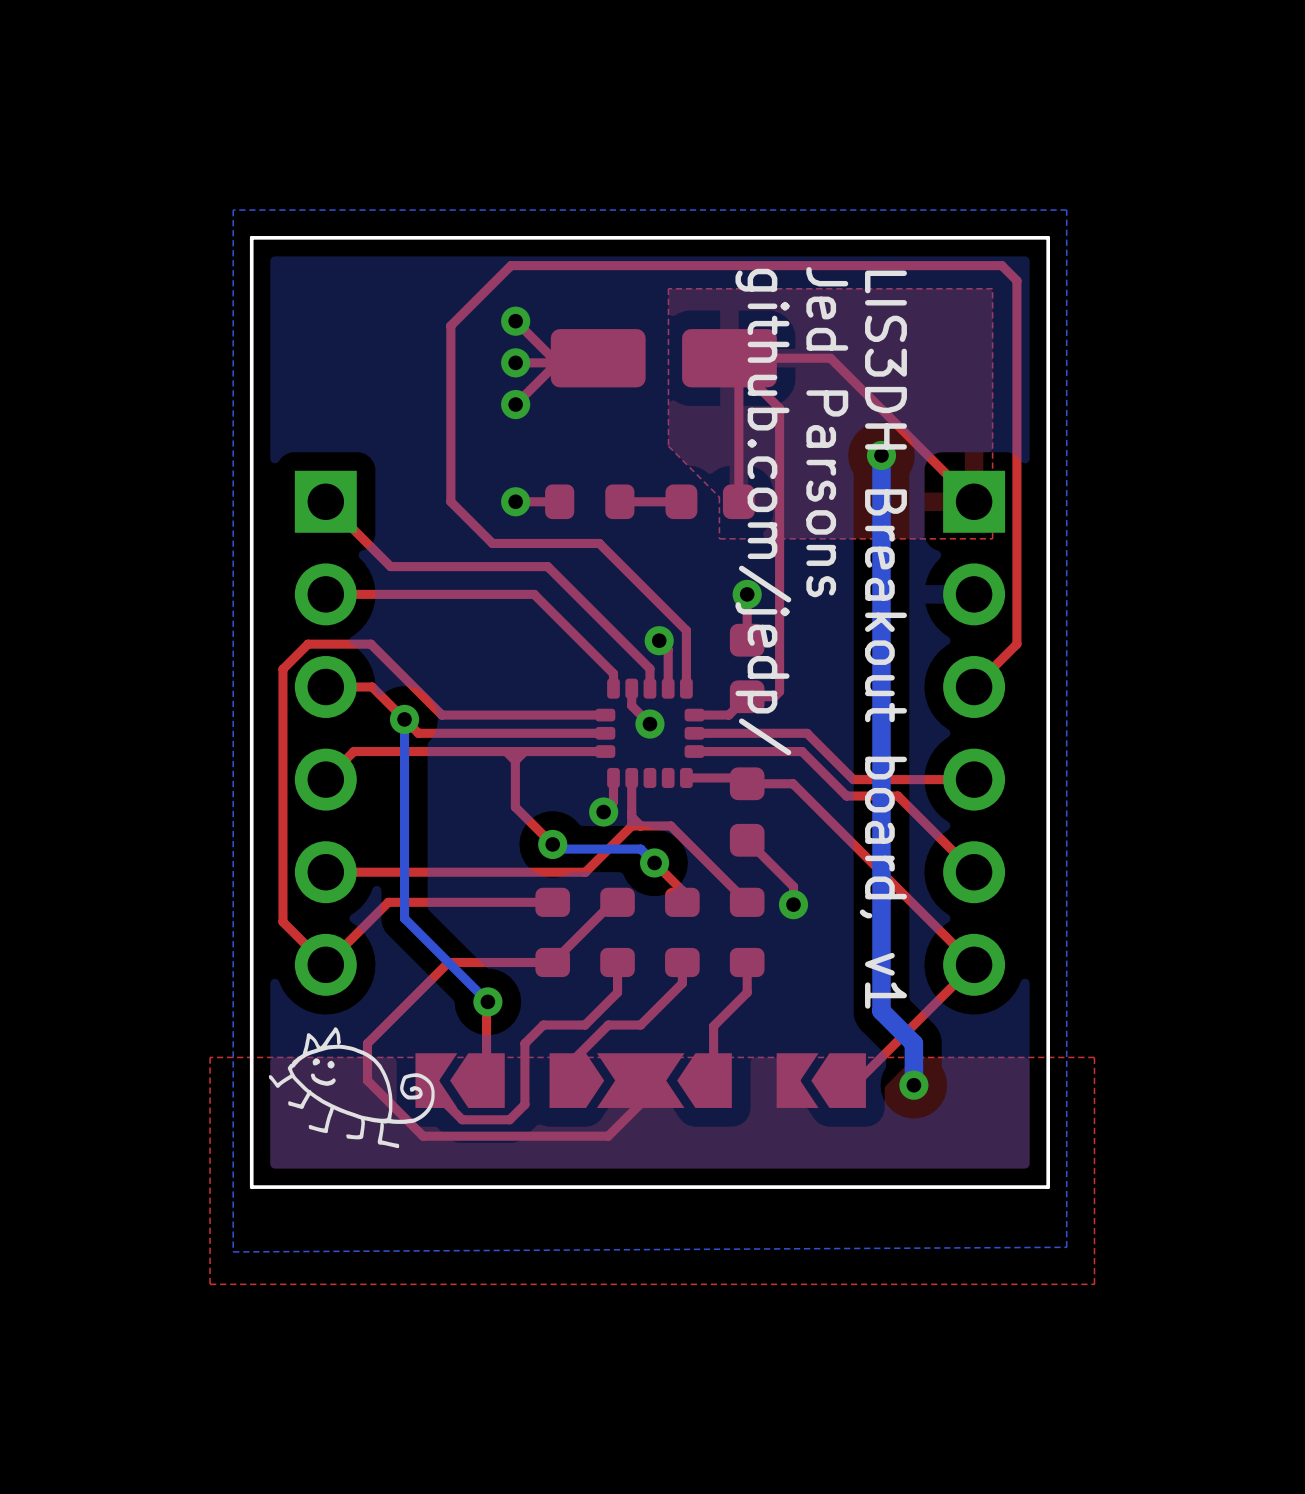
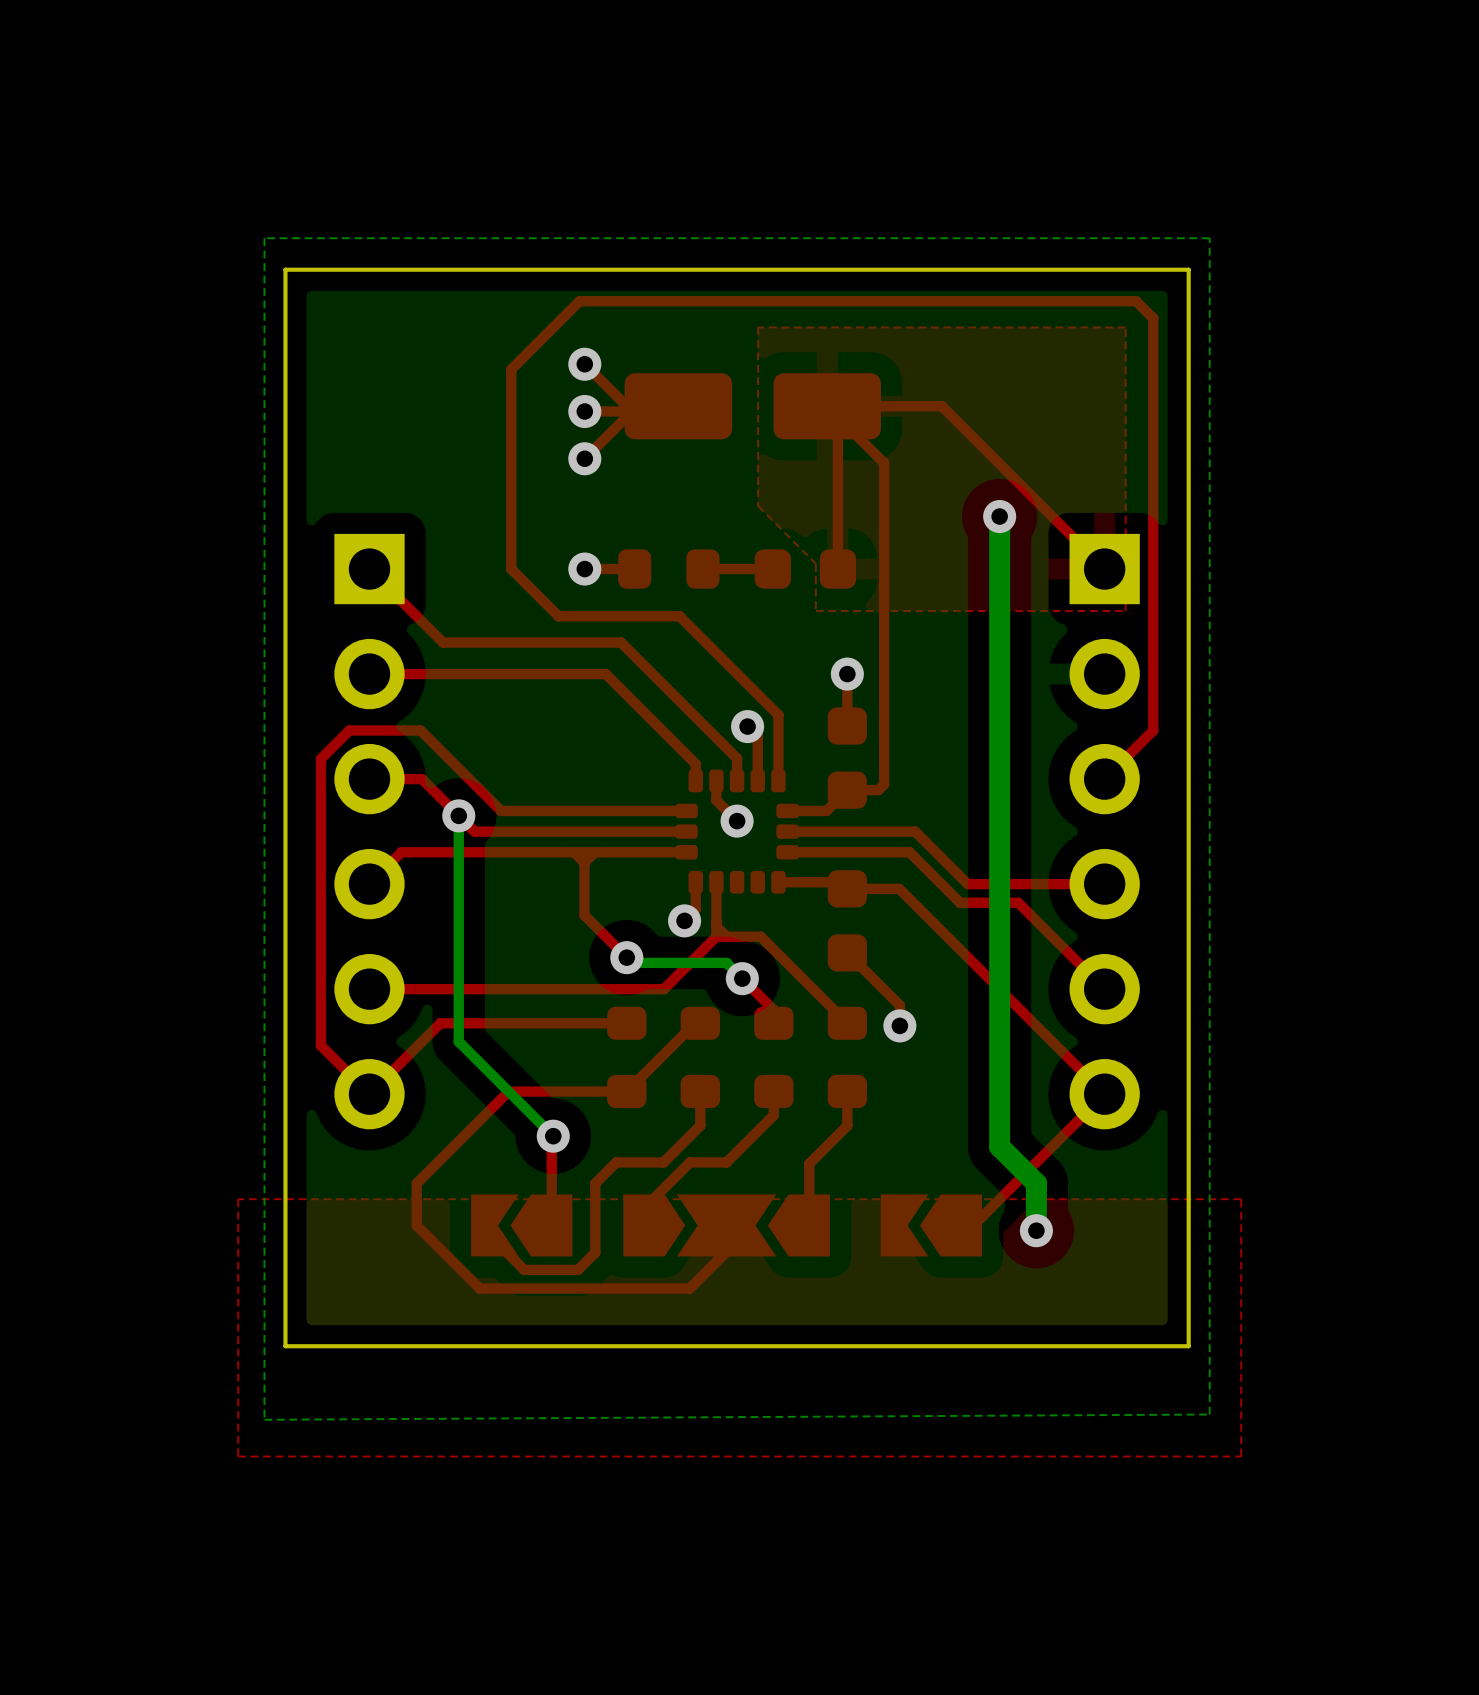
text: Jed Parsons (827, 432) -> none
text: github.com/jedp/ (763, 512) -> none
text: LIS3DH Breakout board, v1 (883, 639) -> none
drawing: [268, 1027, 435, 1149] -> none

